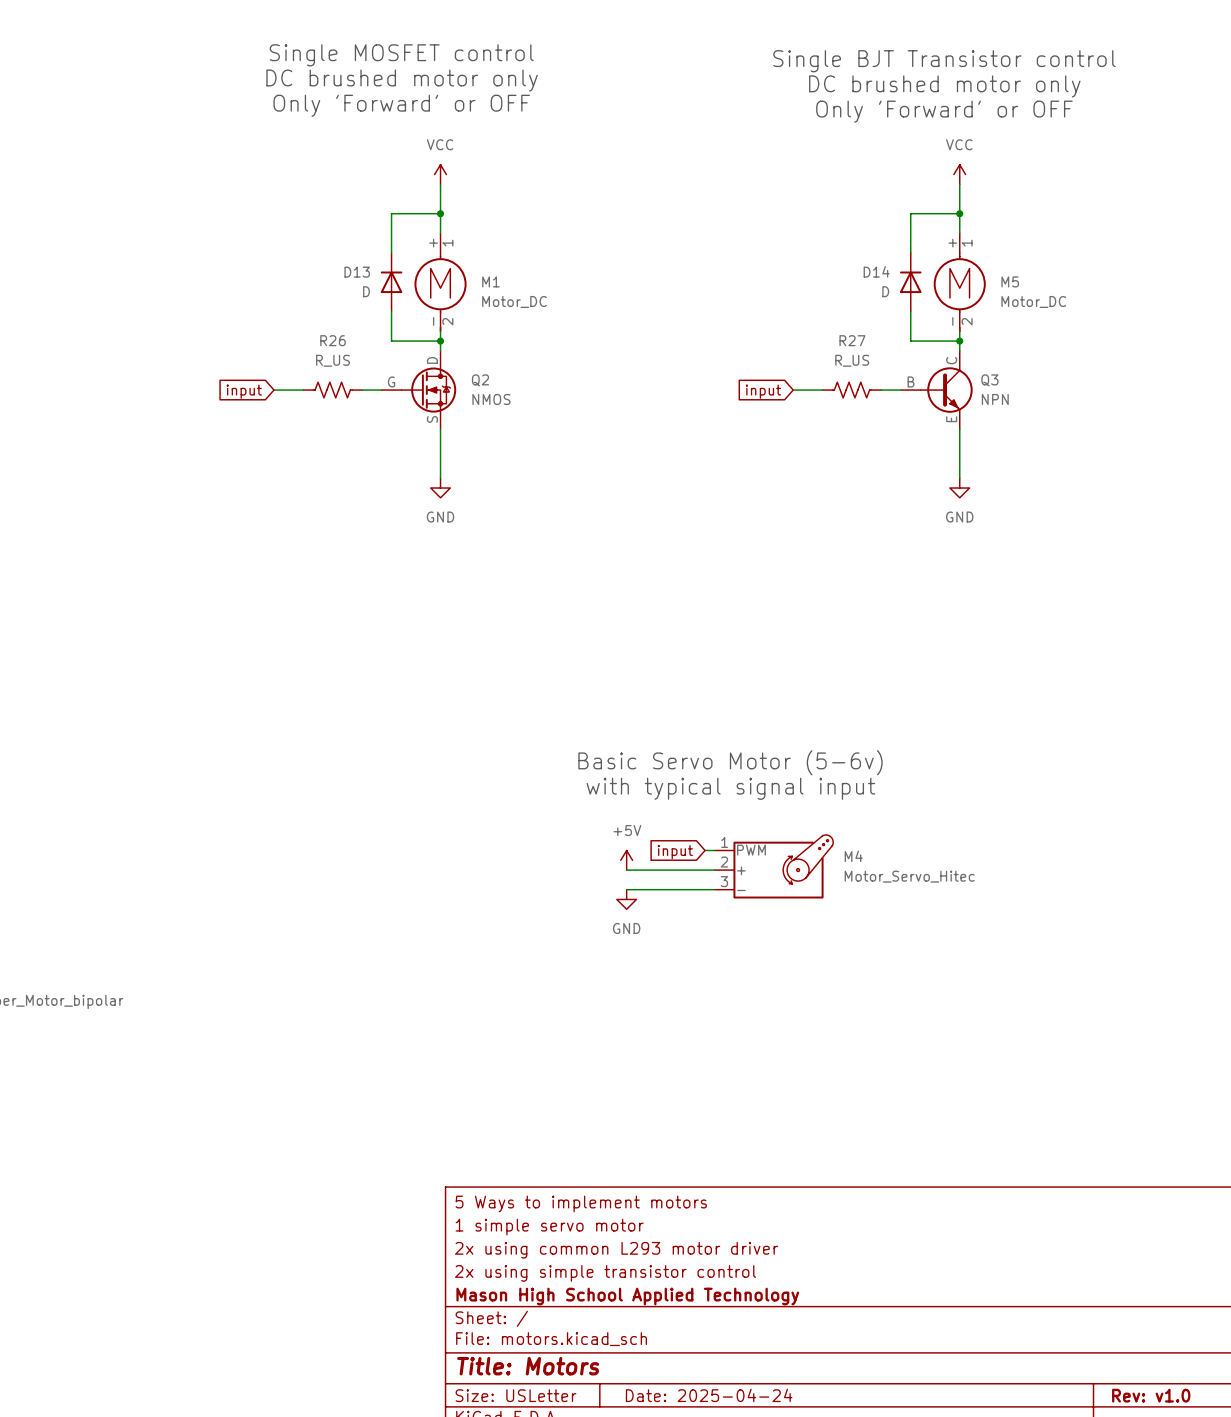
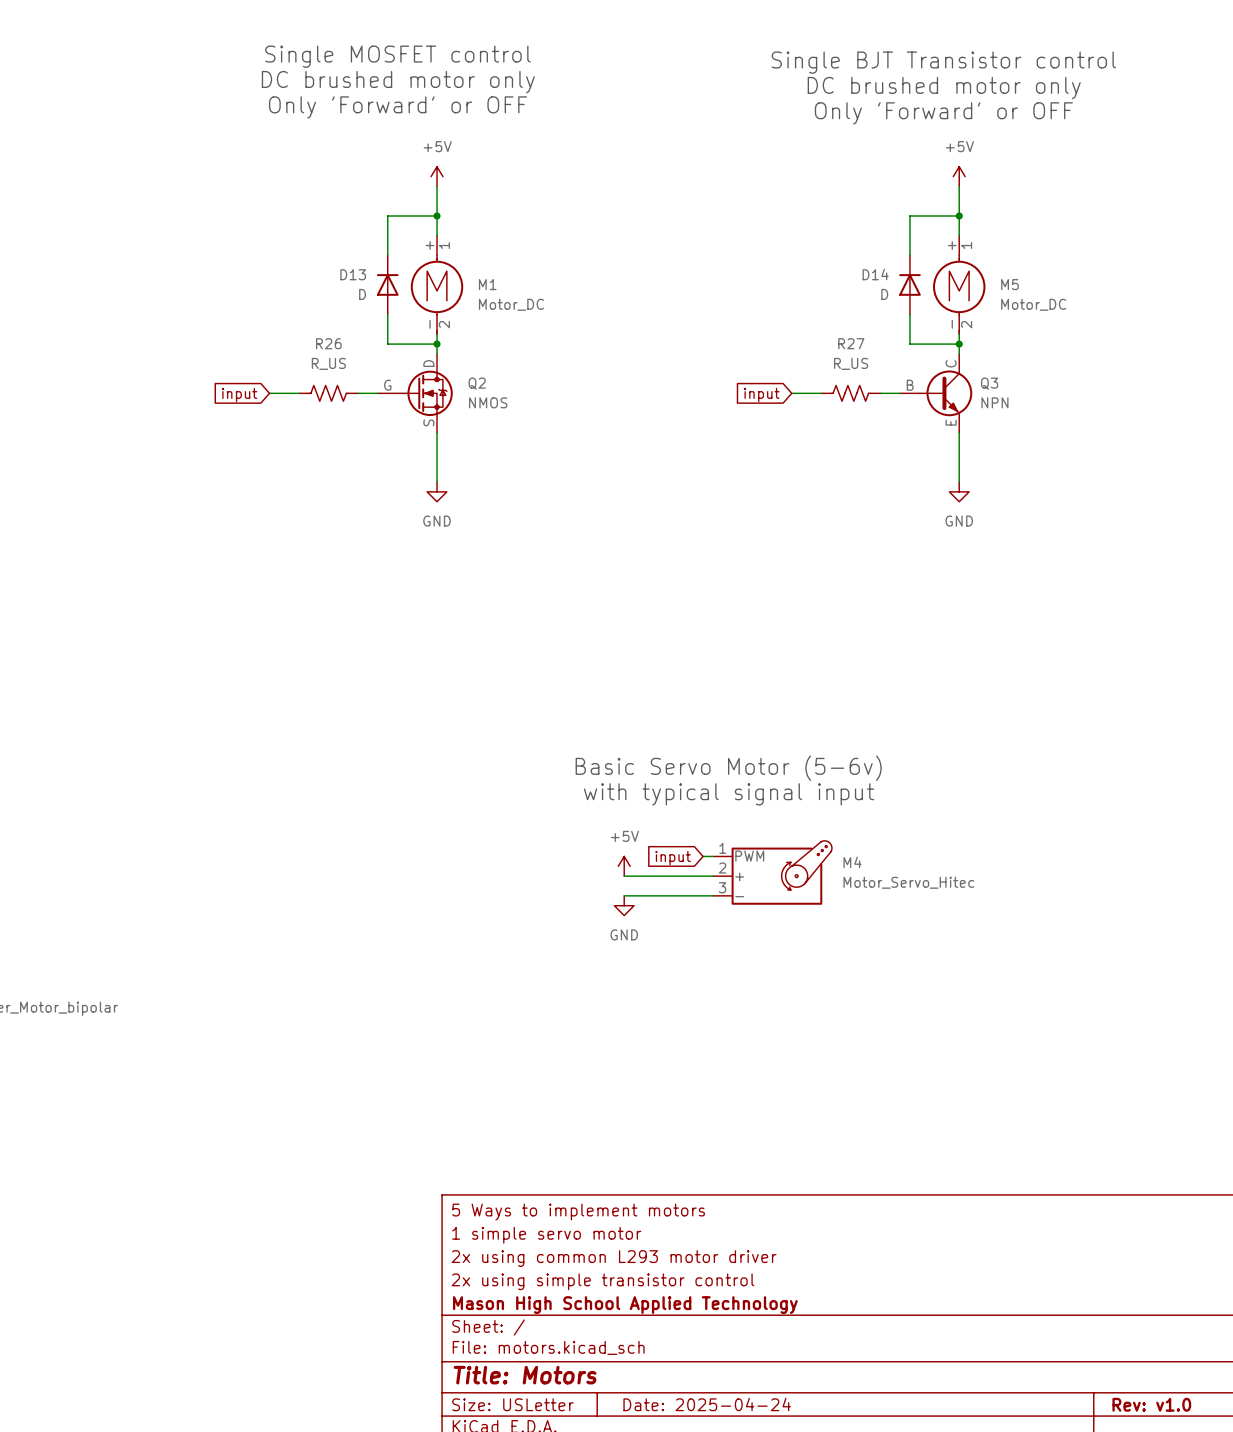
power symbol: VCC (440, 174) -> +5V (437, 176)
power symbol: VCC (959, 174) -> +5V (959, 176)

